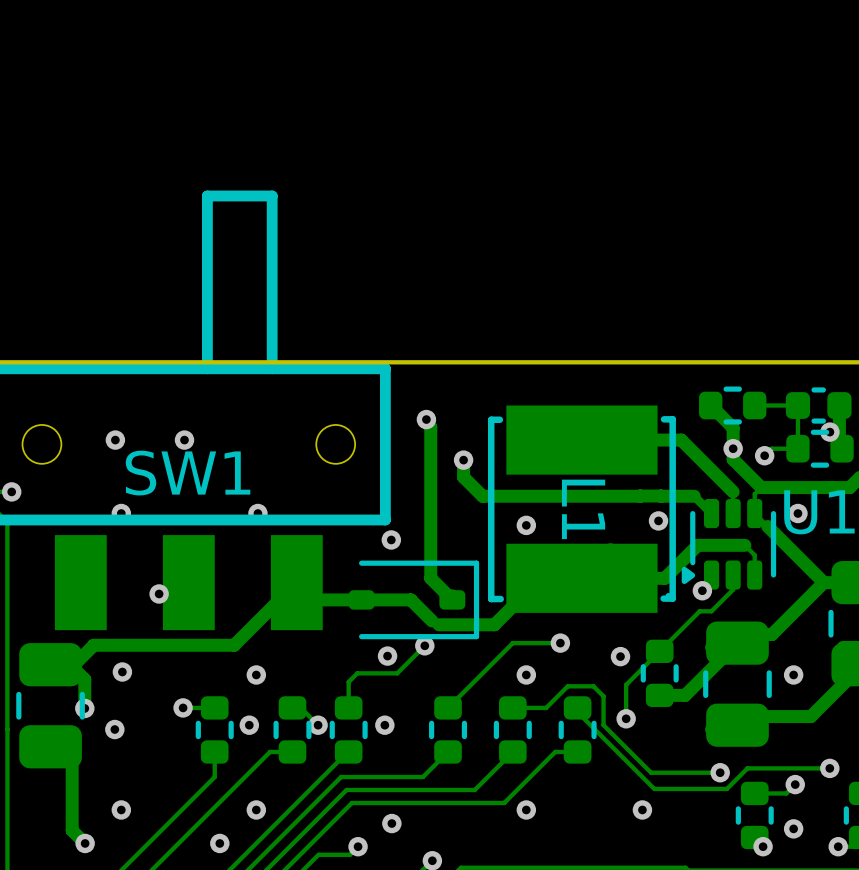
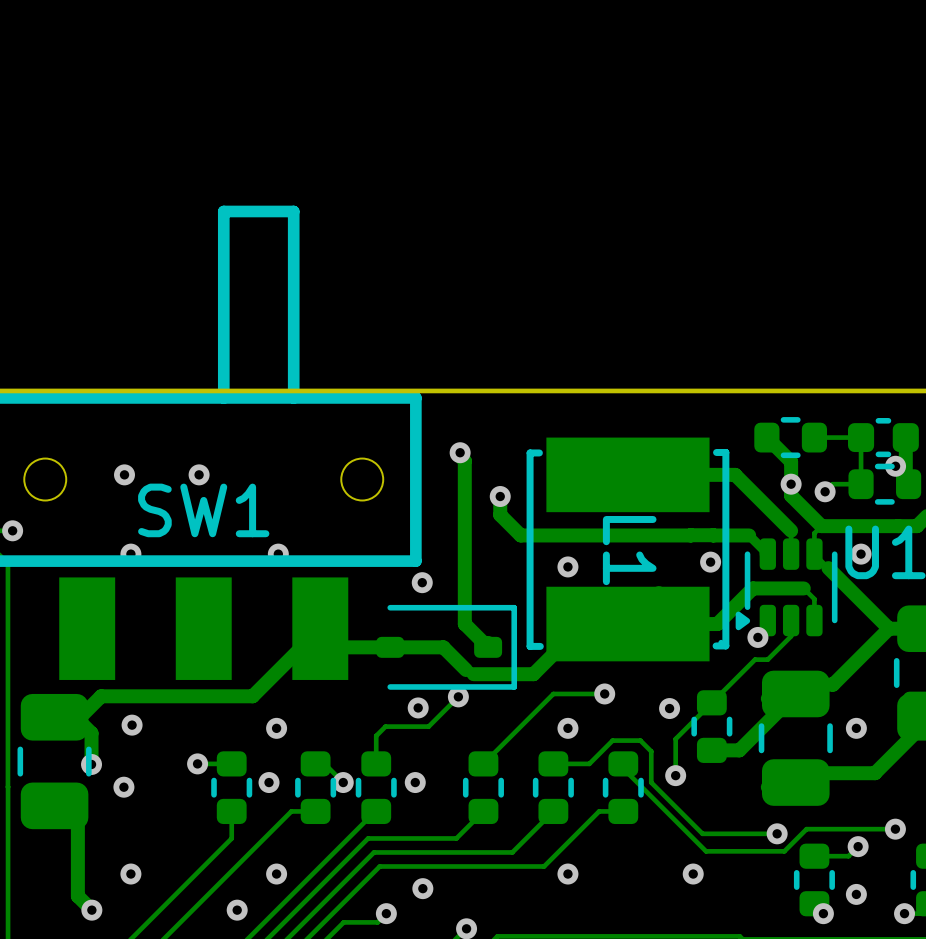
via: (159, 593) -> none

